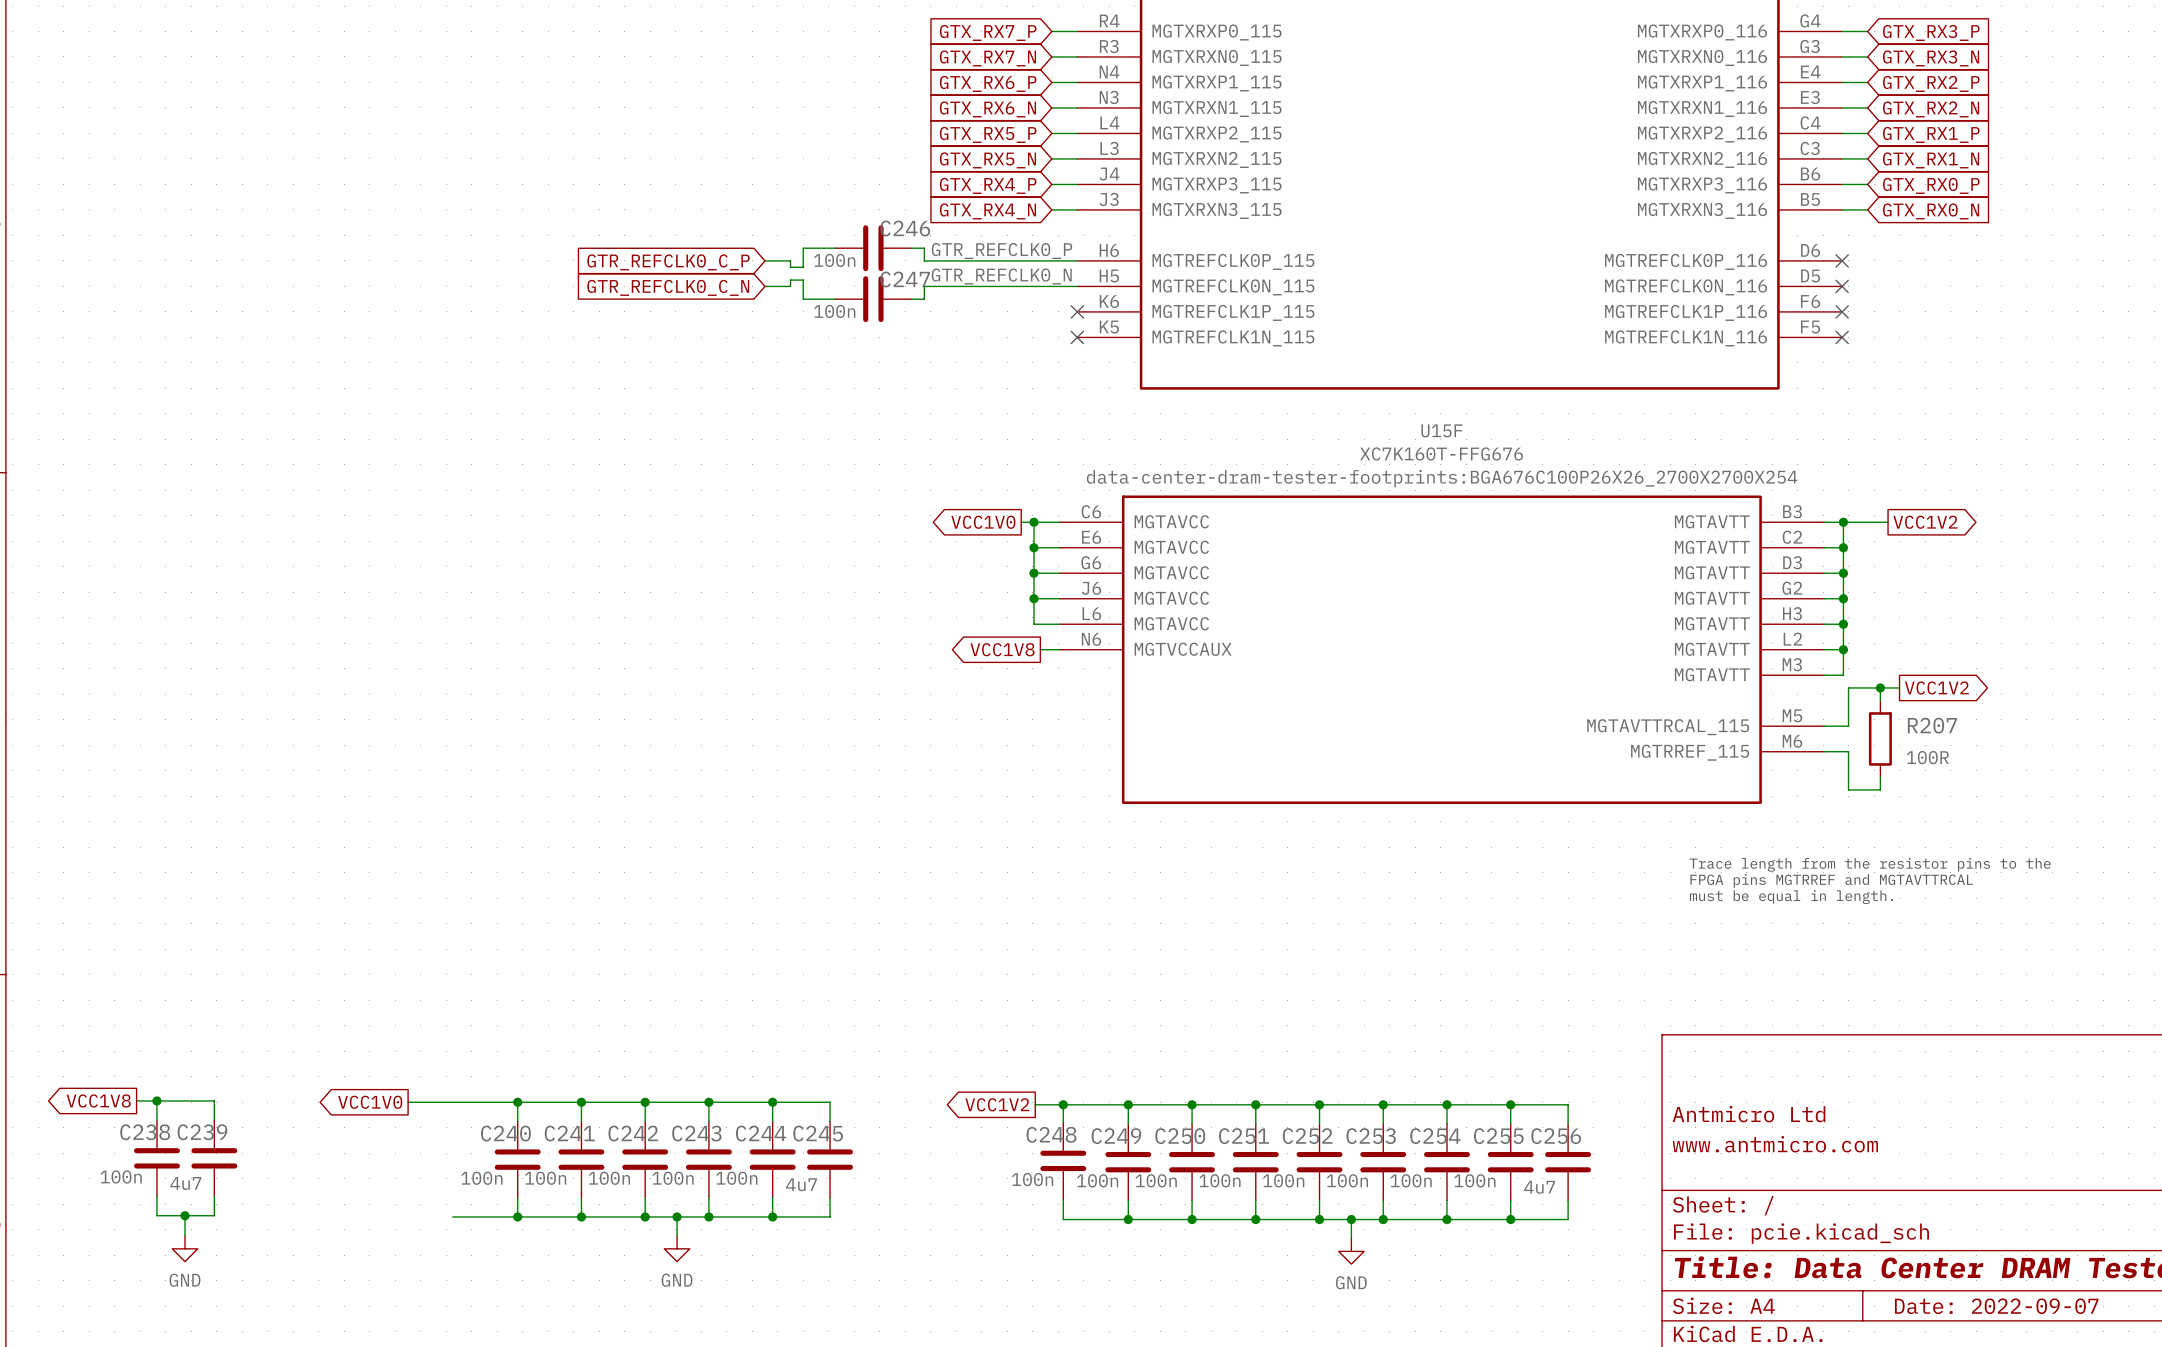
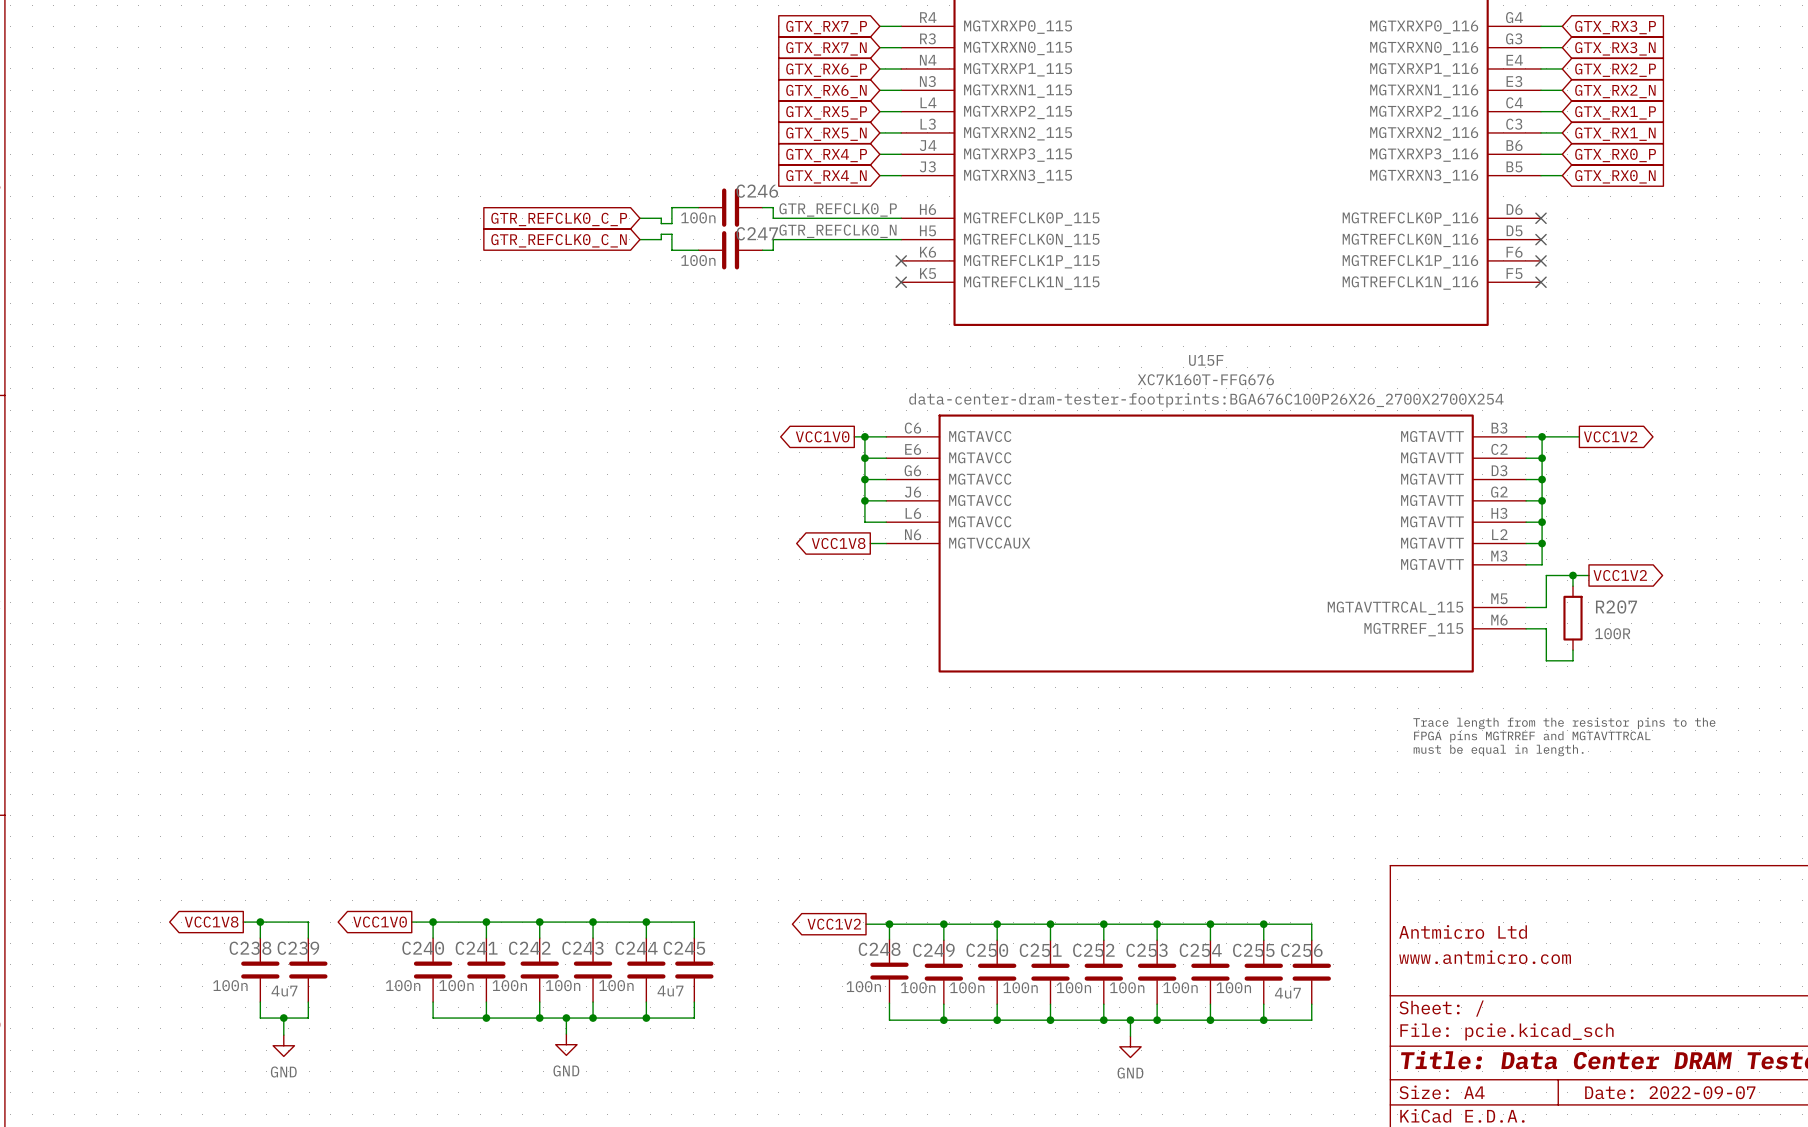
global label position: VCC1V8 (98, 1100) -> VCC1V8 (211, 922)
wire: (136, 1100) (214, 1100) (214, 1120) -> (243, 922) (308, 922) (308, 938)
wire: (156, 1100) (156, 1120) -> (260, 922) (260, 938)
junction: (156, 1100) -> none
junction: none -> (260, 922)
global label position: VCC1V0 (370, 1102) -> VCC1V0 (380, 922)
wire: (408, 1102) (492, 1102) -> none
C238 position: (156, 1158) -> (260, 970)
C239 position: (214, 1158) -> (308, 970)
wire: (156, 1196) (156, 1215) (214, 1215) (214, 1196) -> (260, 1002) (260, 1018) (308, 1018) (308, 1002)
wire: (185, 1215) (185, 1236) -> (283, 1018) (283, 1035)
junction: (185, 1215) -> none
junction: none -> (283, 1018)
wire: (452, 1216) (517, 1216) -> none
junction: (517, 1216) -> none
power symbol position: GND (185, 1248) -> GND (283, 1045)

